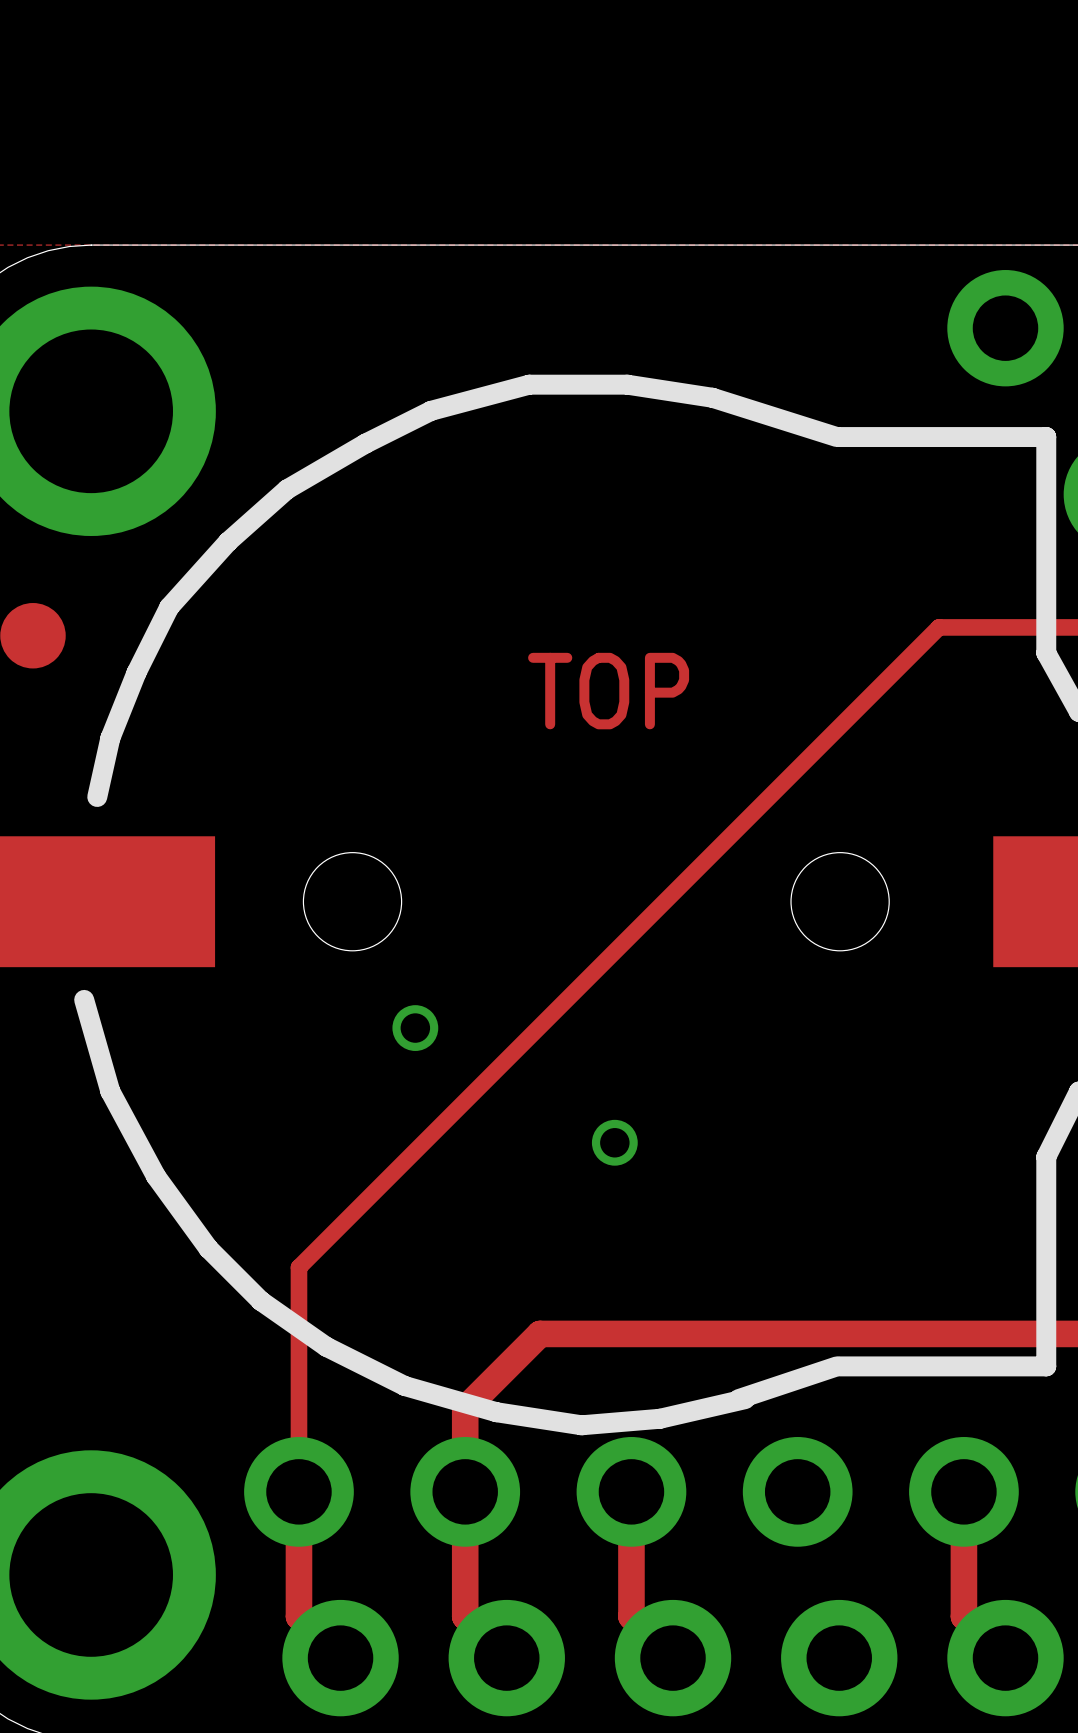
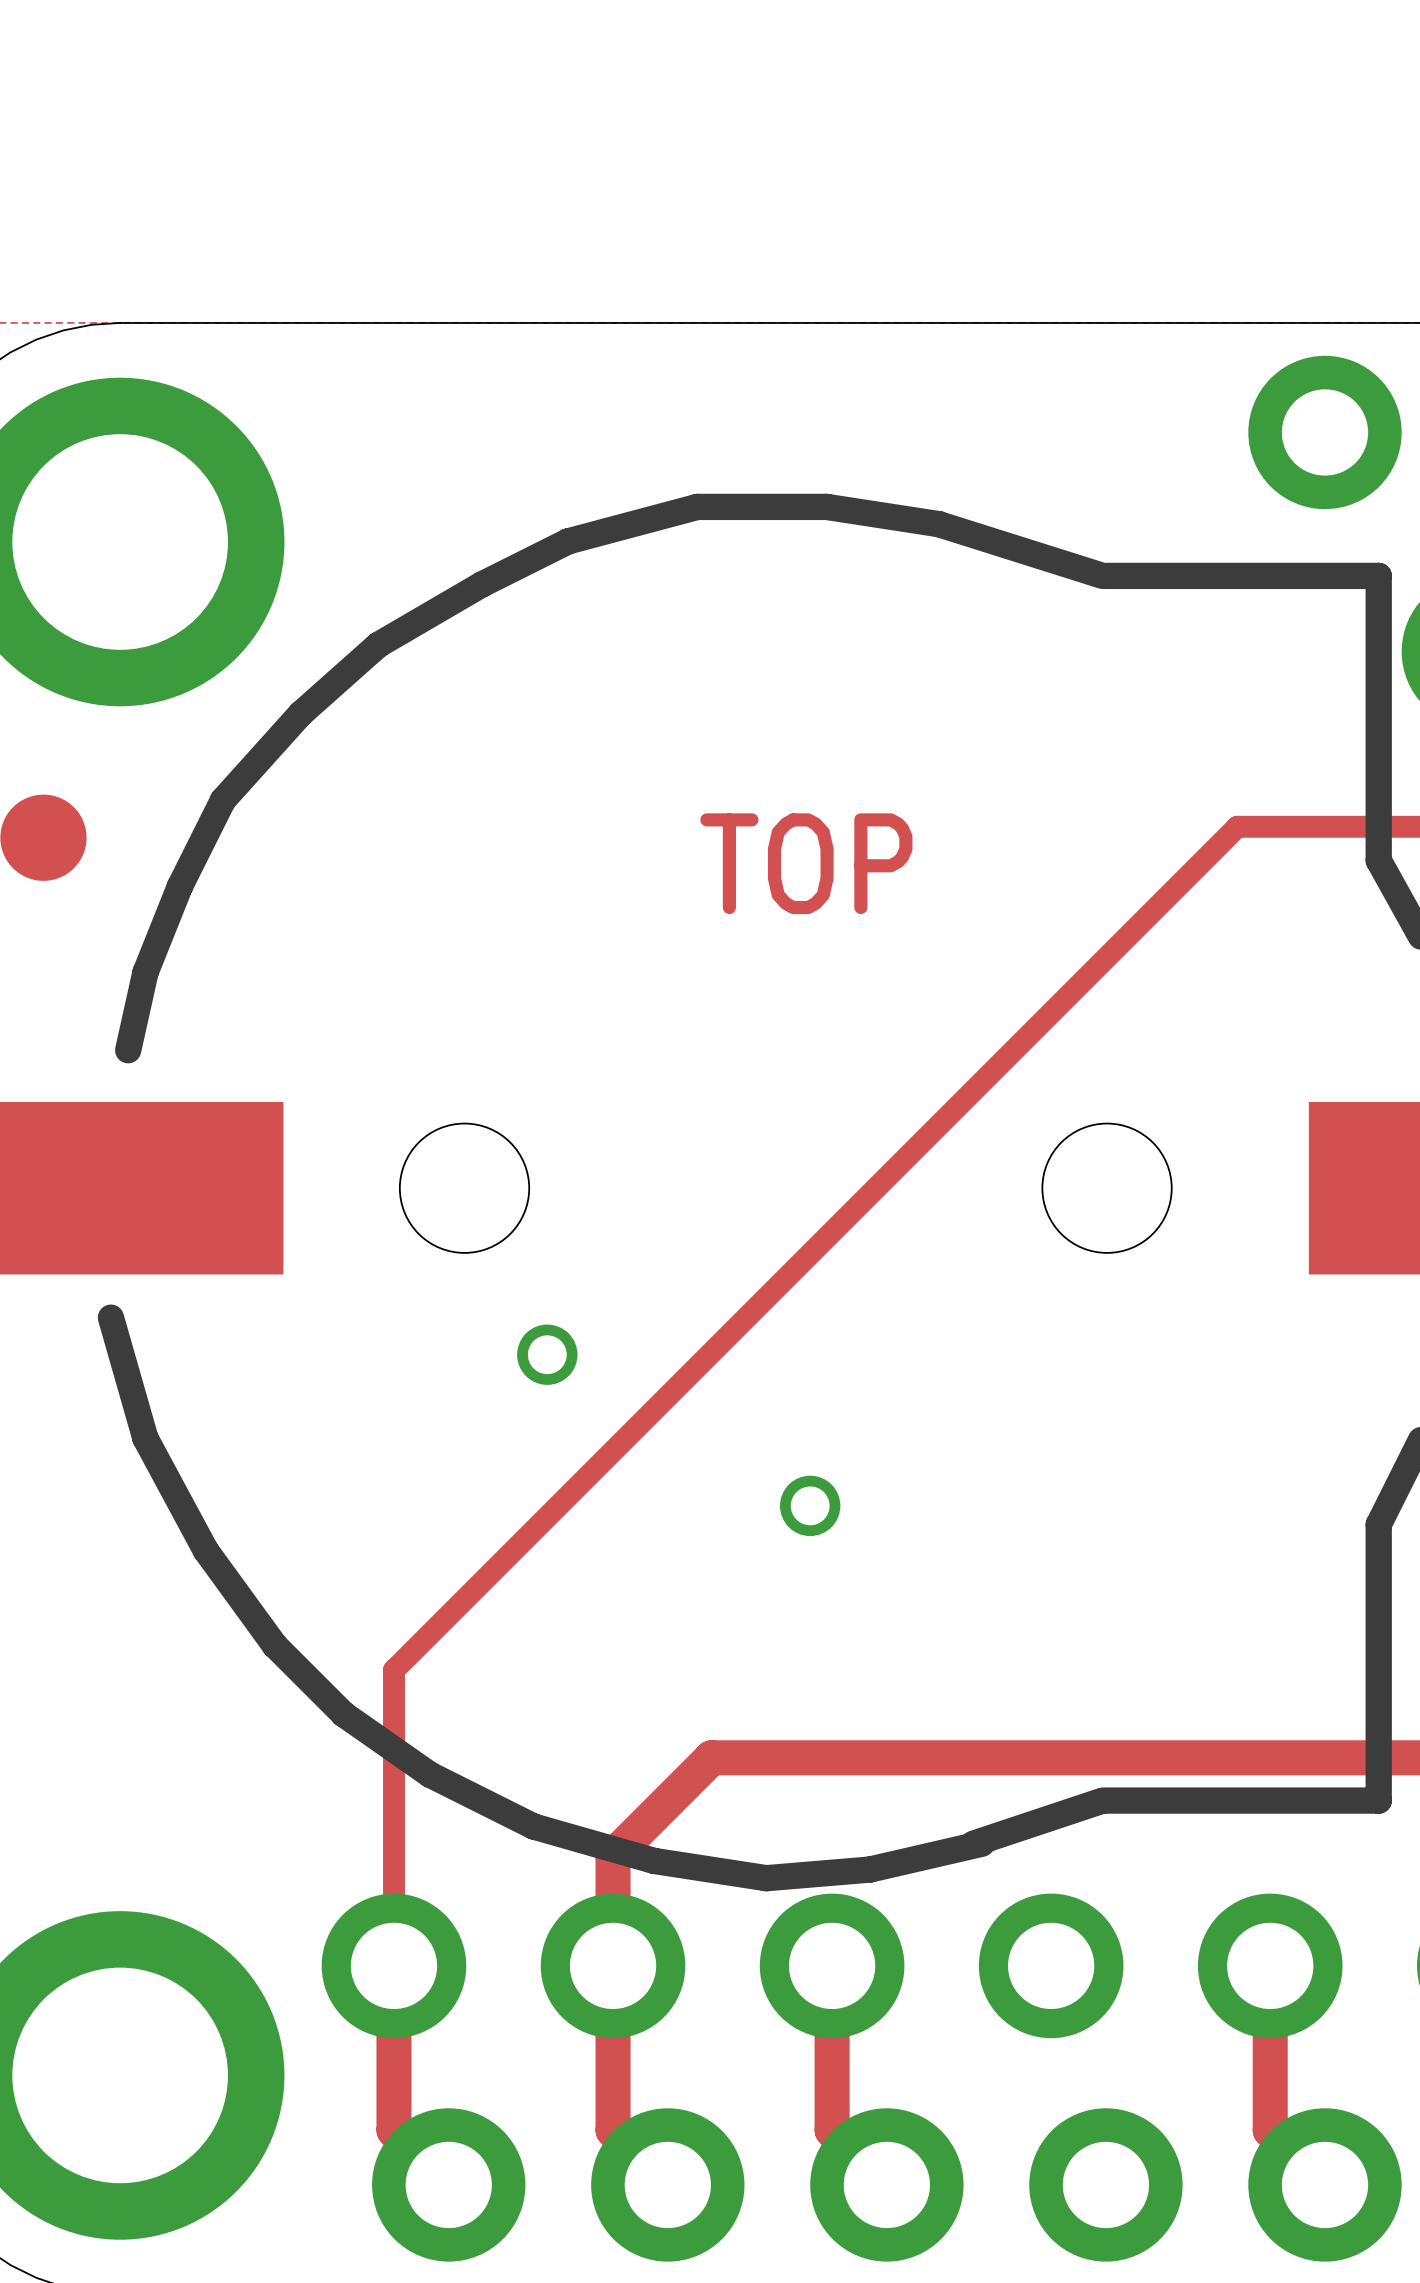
text position: TOP (608, 691) -> TOP (806, 863)

